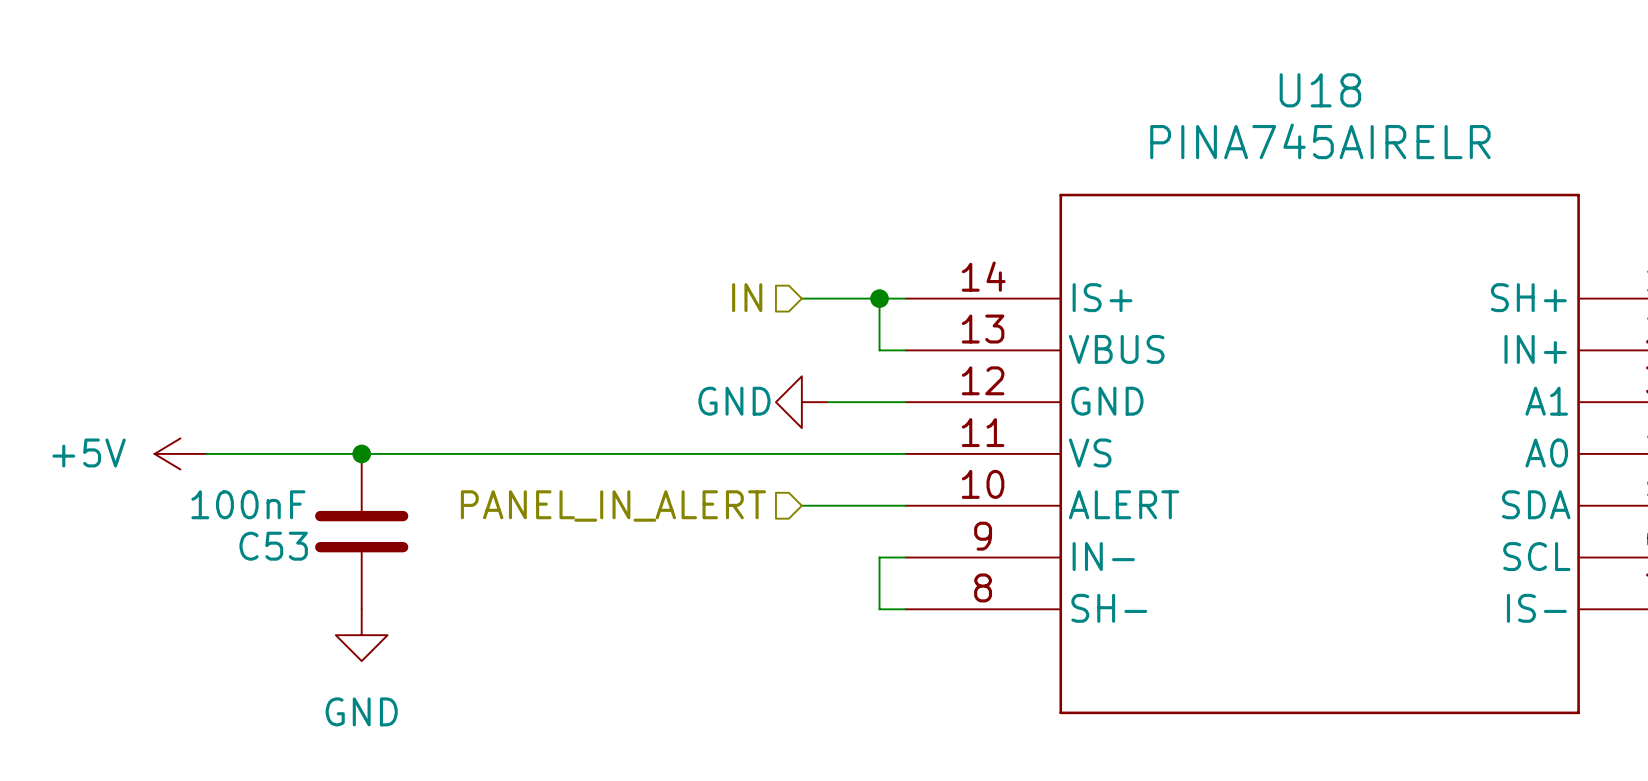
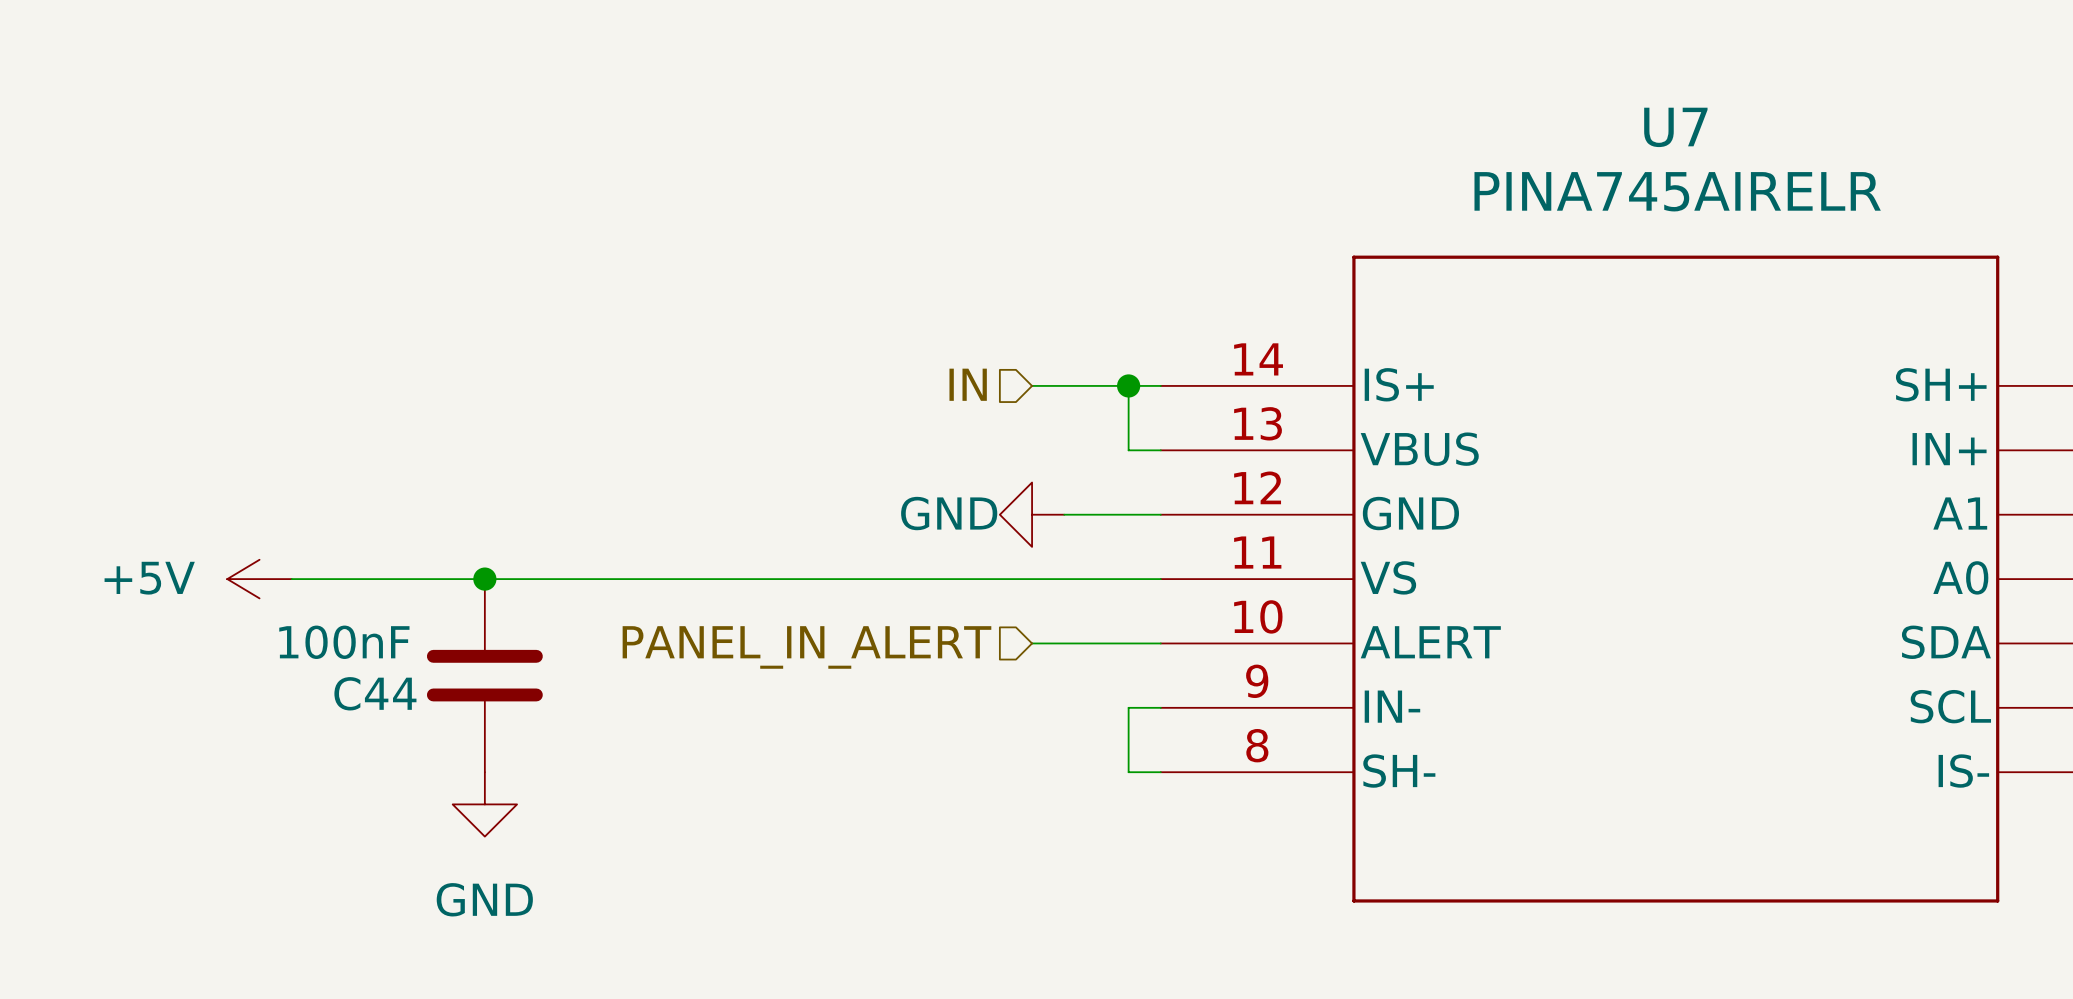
U18 name: U18 (1320, 90) -> U7 (1675, 127)
C53 name: C53 (273, 546) -> C44 (375, 693)

